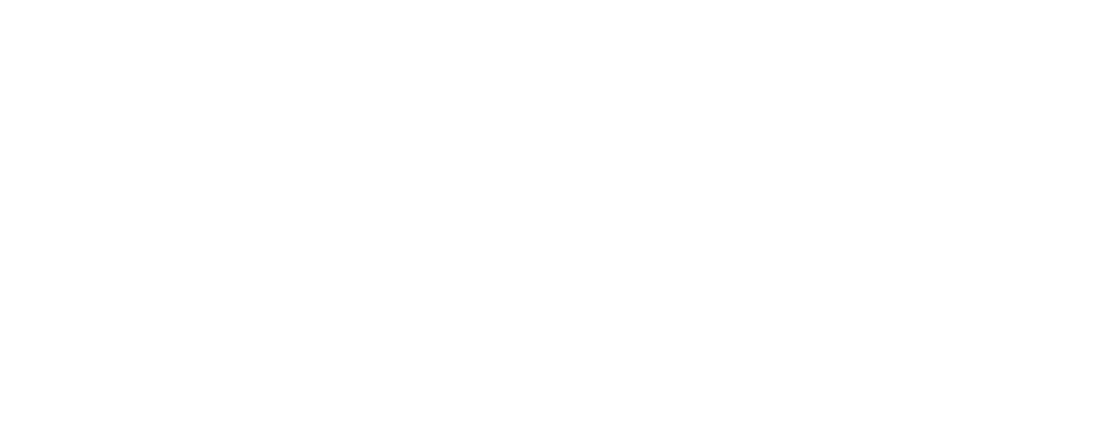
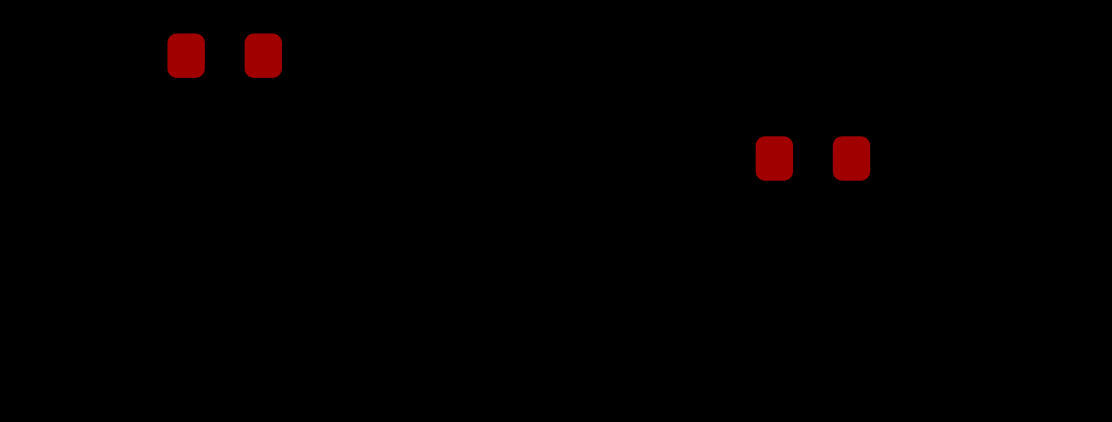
part: none -> (224, 55)
part: none -> (812, 158)

